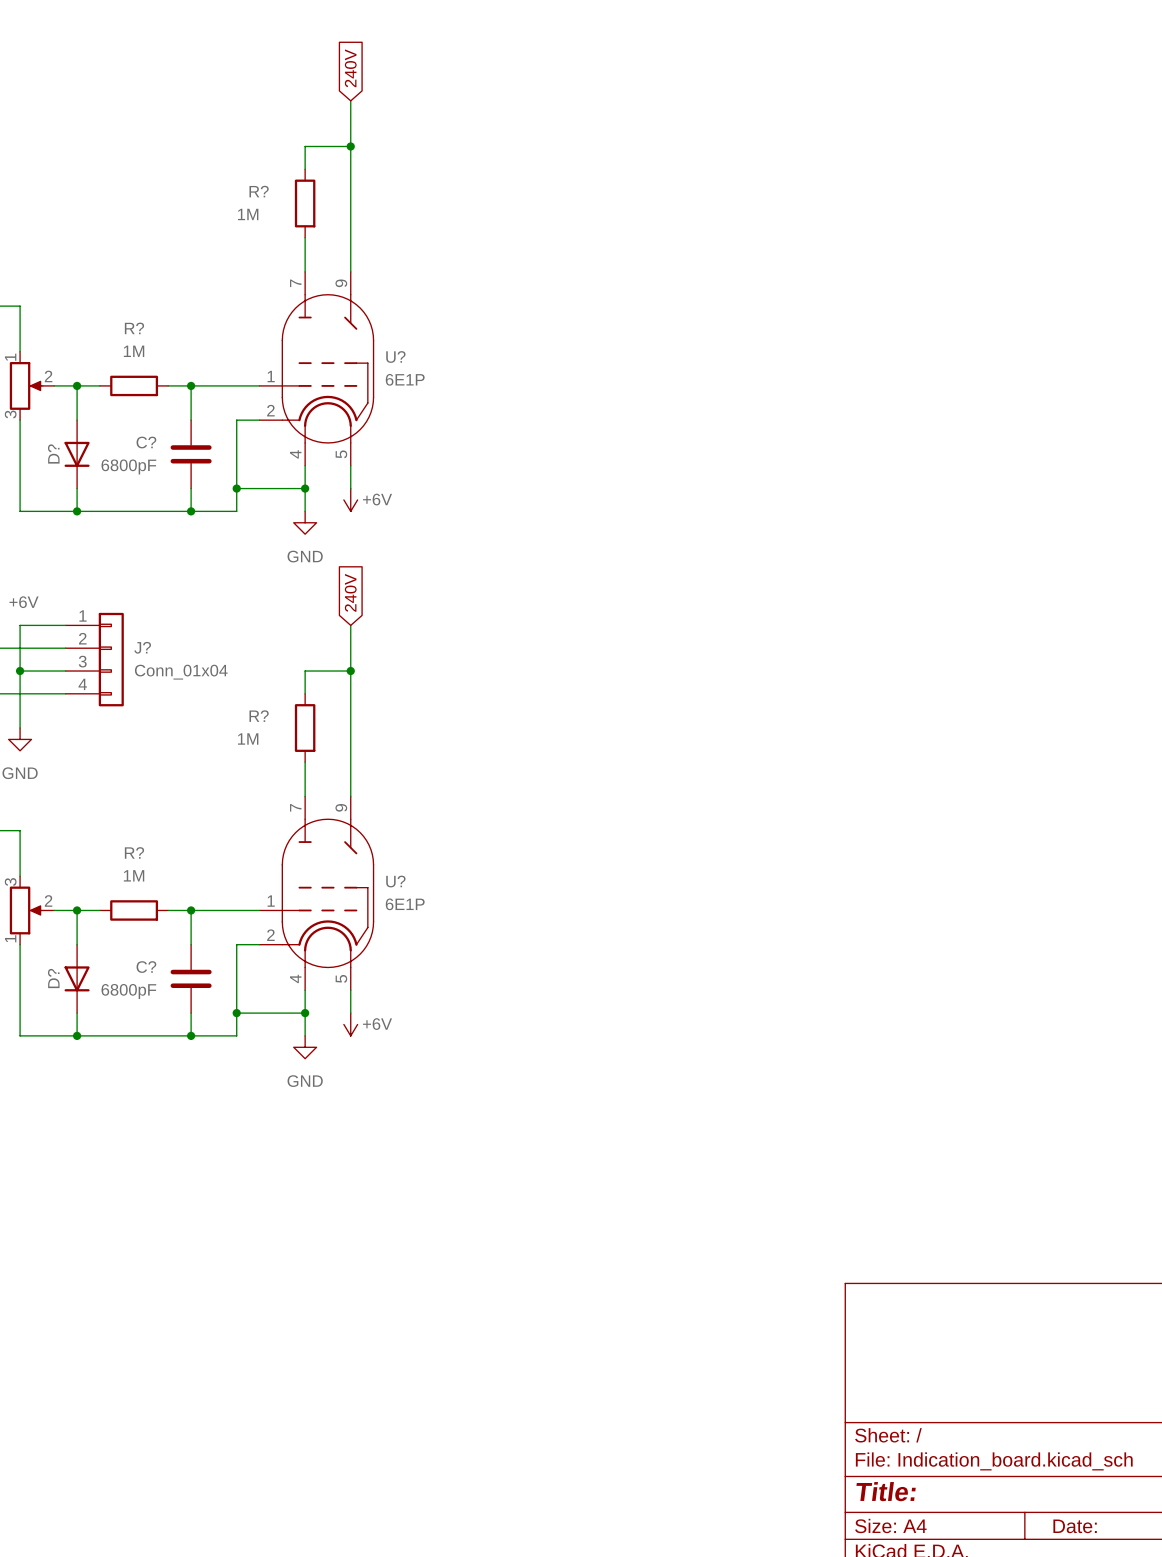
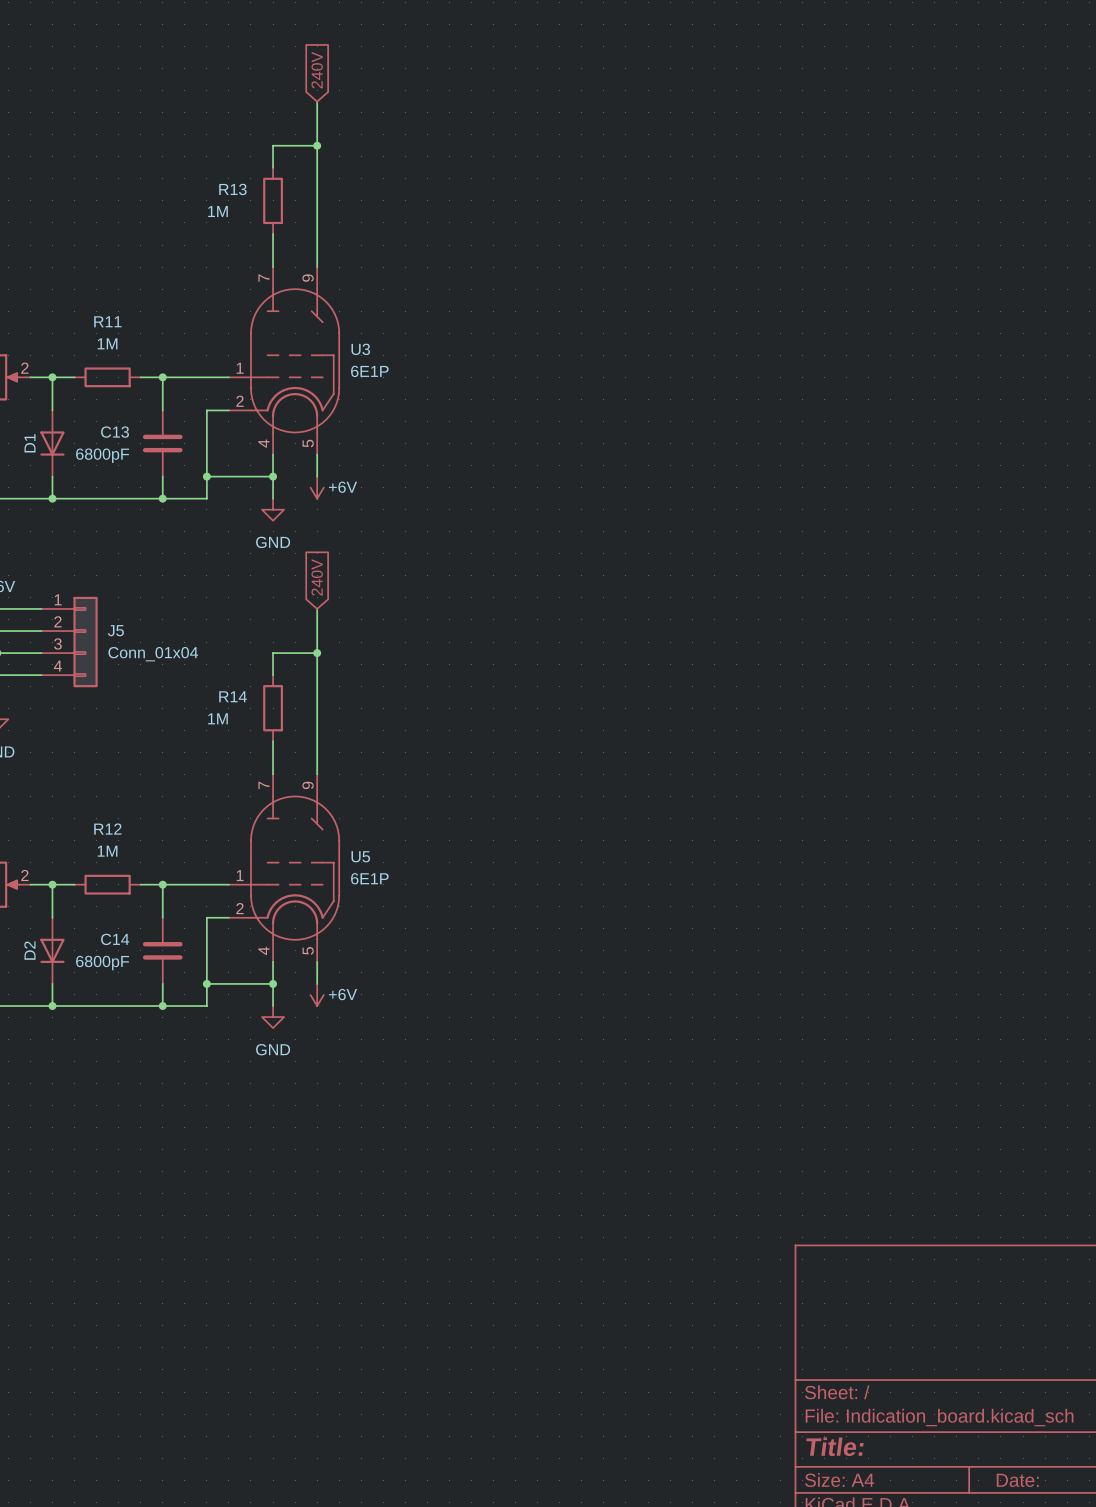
R? name: R? (259, 191) -> R13 (232, 189)
R? name: R? (134, 328) -> R11 (107, 321)
U? name: U? (395, 357) -> U3 (360, 349)
C? name: C? (146, 442) -> C13 (115, 432)
D? name: D? (53, 453) -> D1 (30, 443)
J? name: J? (142, 647) -> J5 (115, 630)
R? name: R? (259, 716) -> R14 (233, 696)
R? name: R? (134, 852) -> R12 (107, 829)
U? name: U? (395, 881) -> U5 (360, 856)
C? name: C? (146, 967) -> C14 (115, 939)
D? name: D? (53, 978) -> D2 (29, 950)

